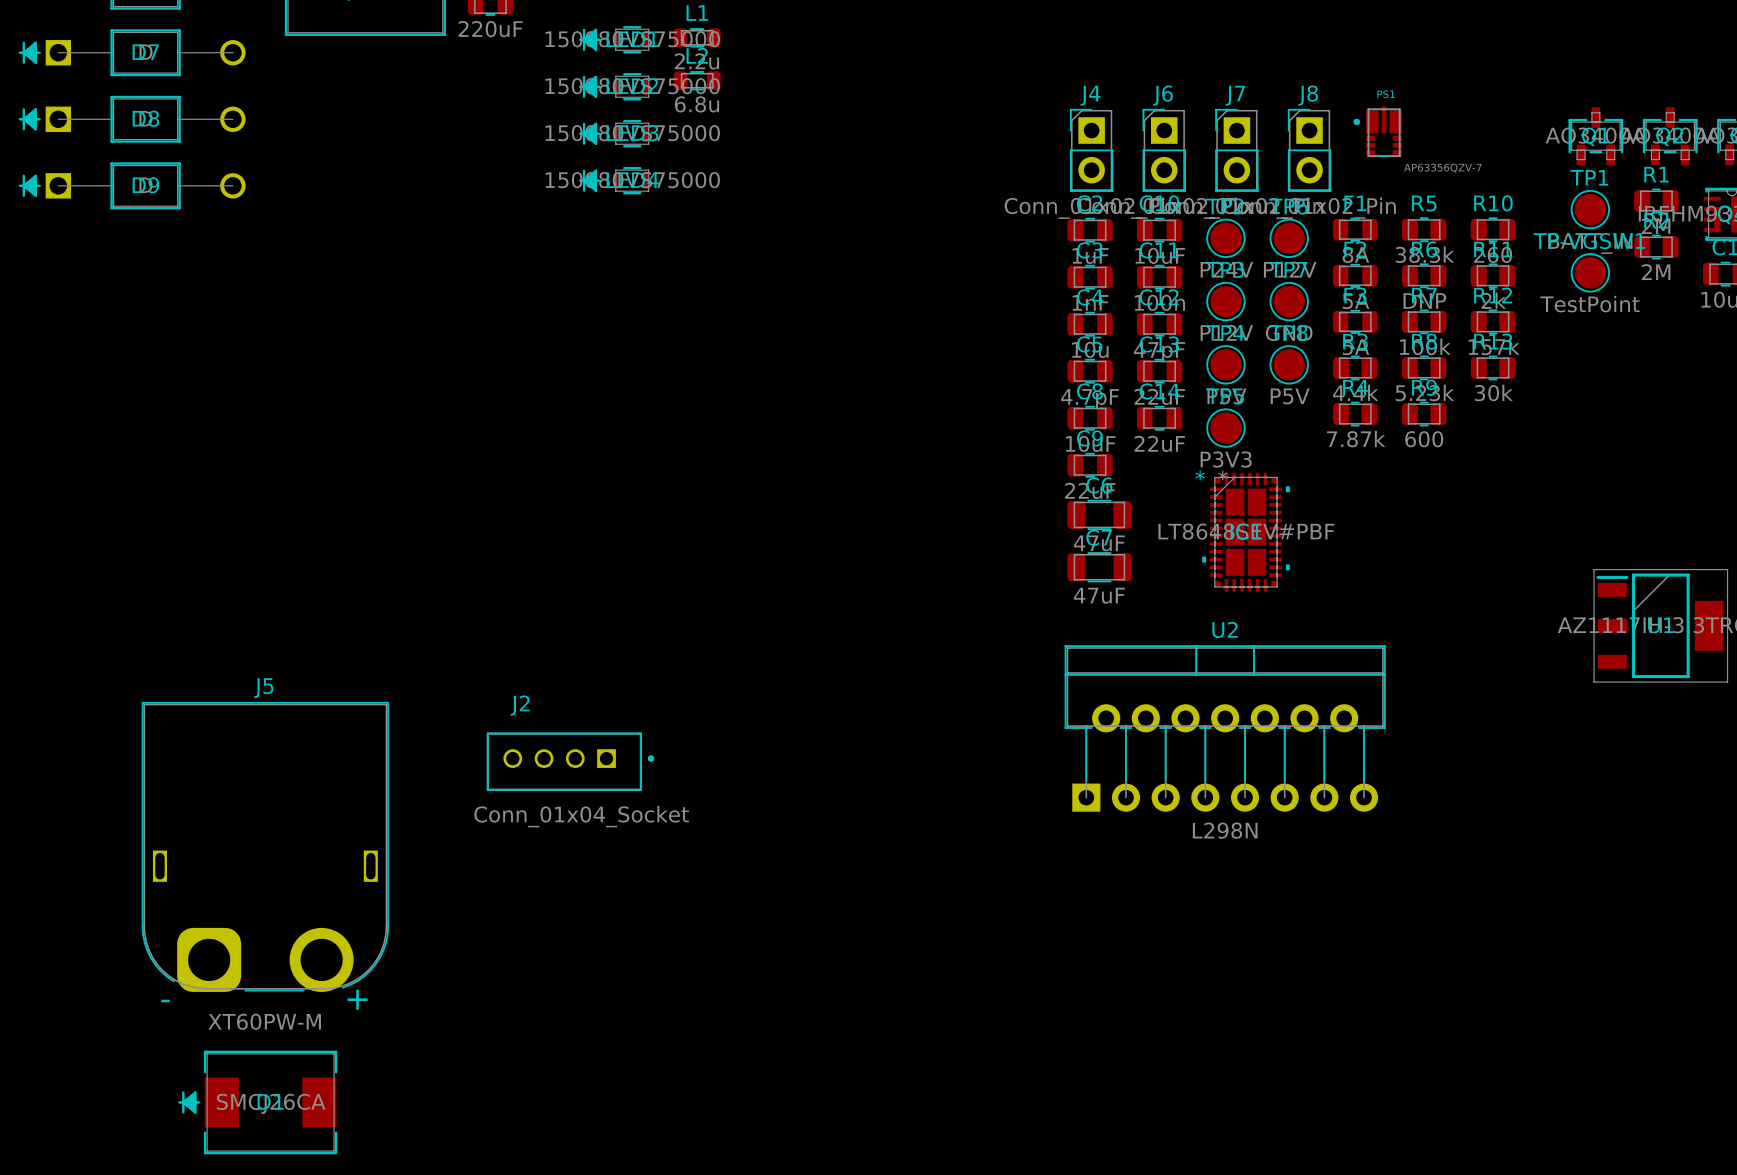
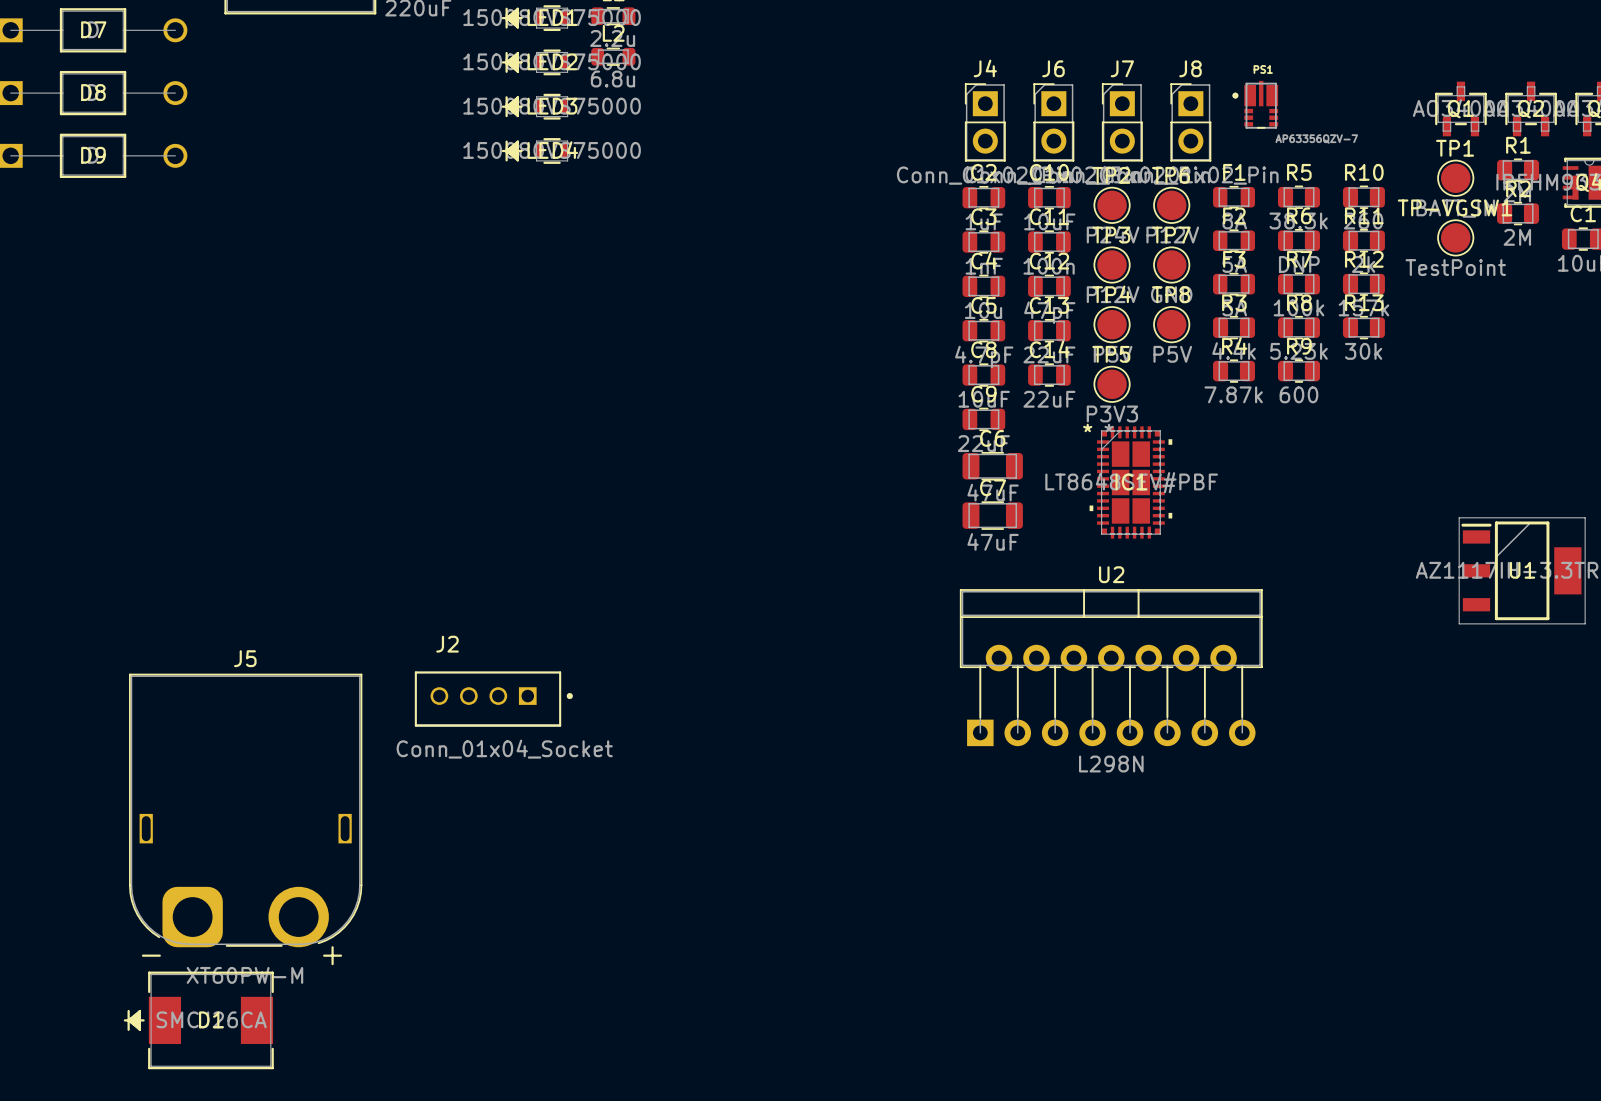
J5 position: (265, 846) -> (245, 810)

